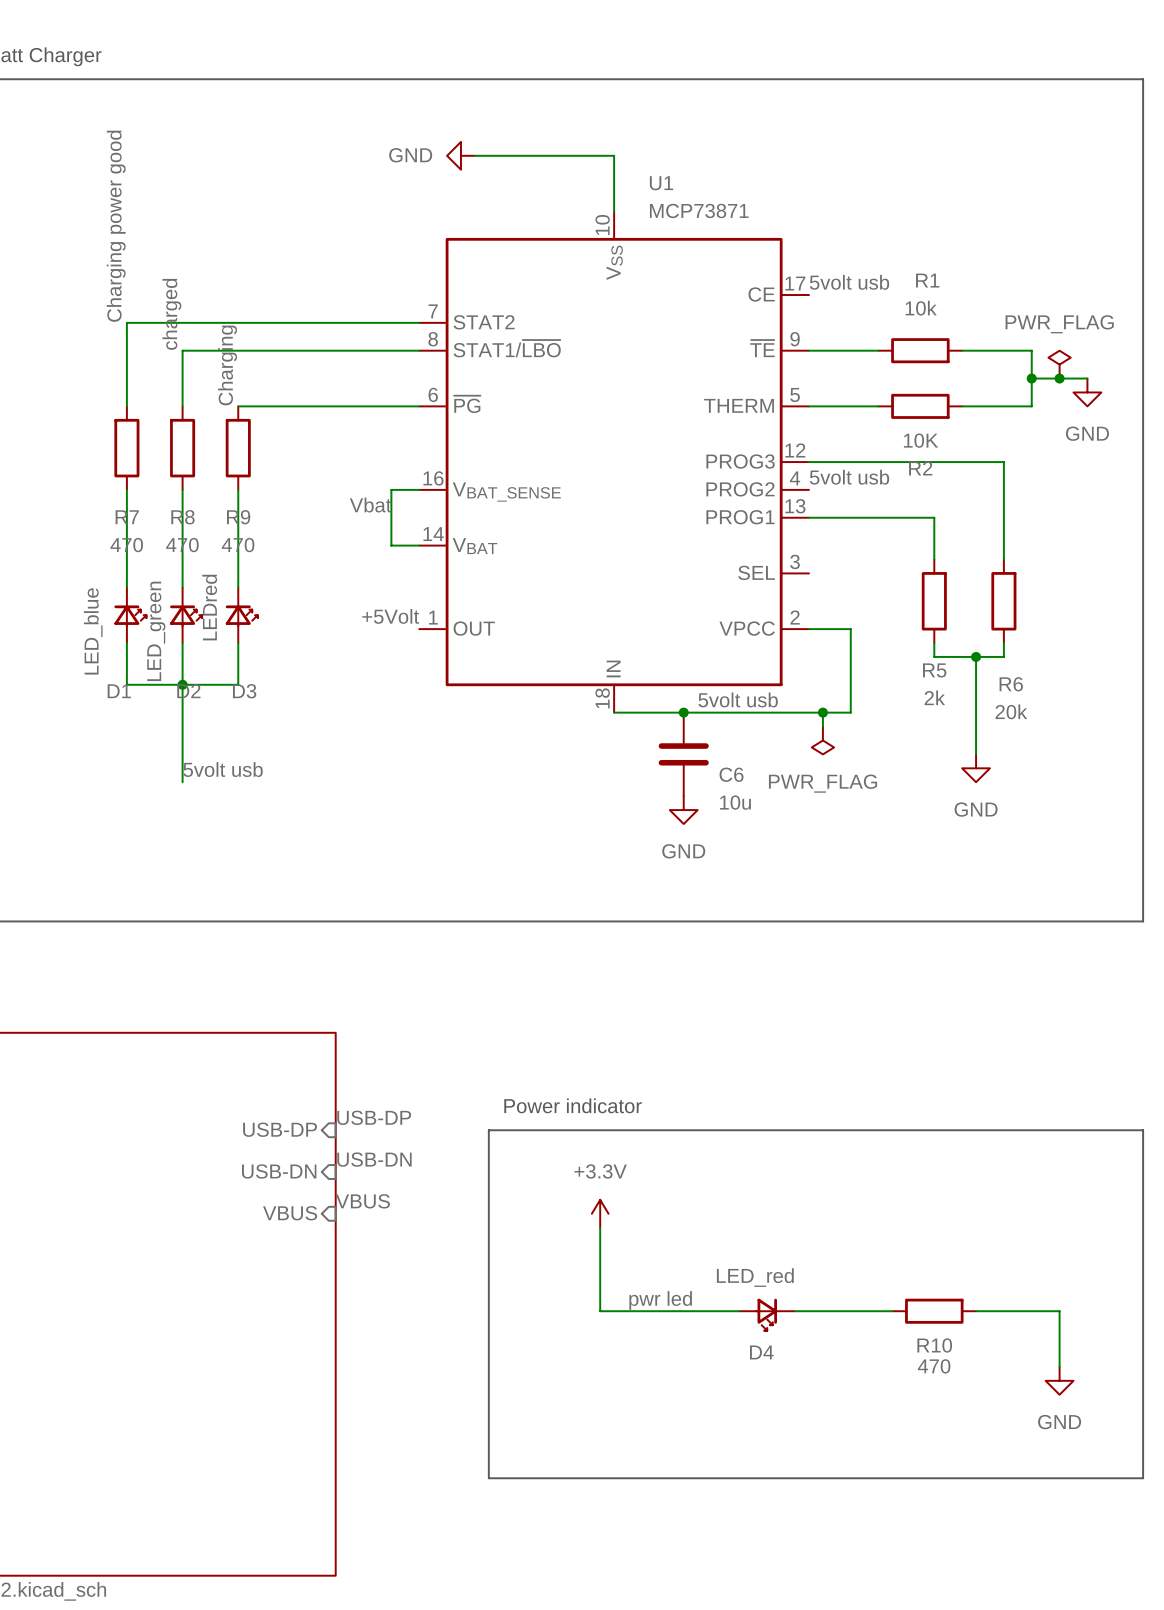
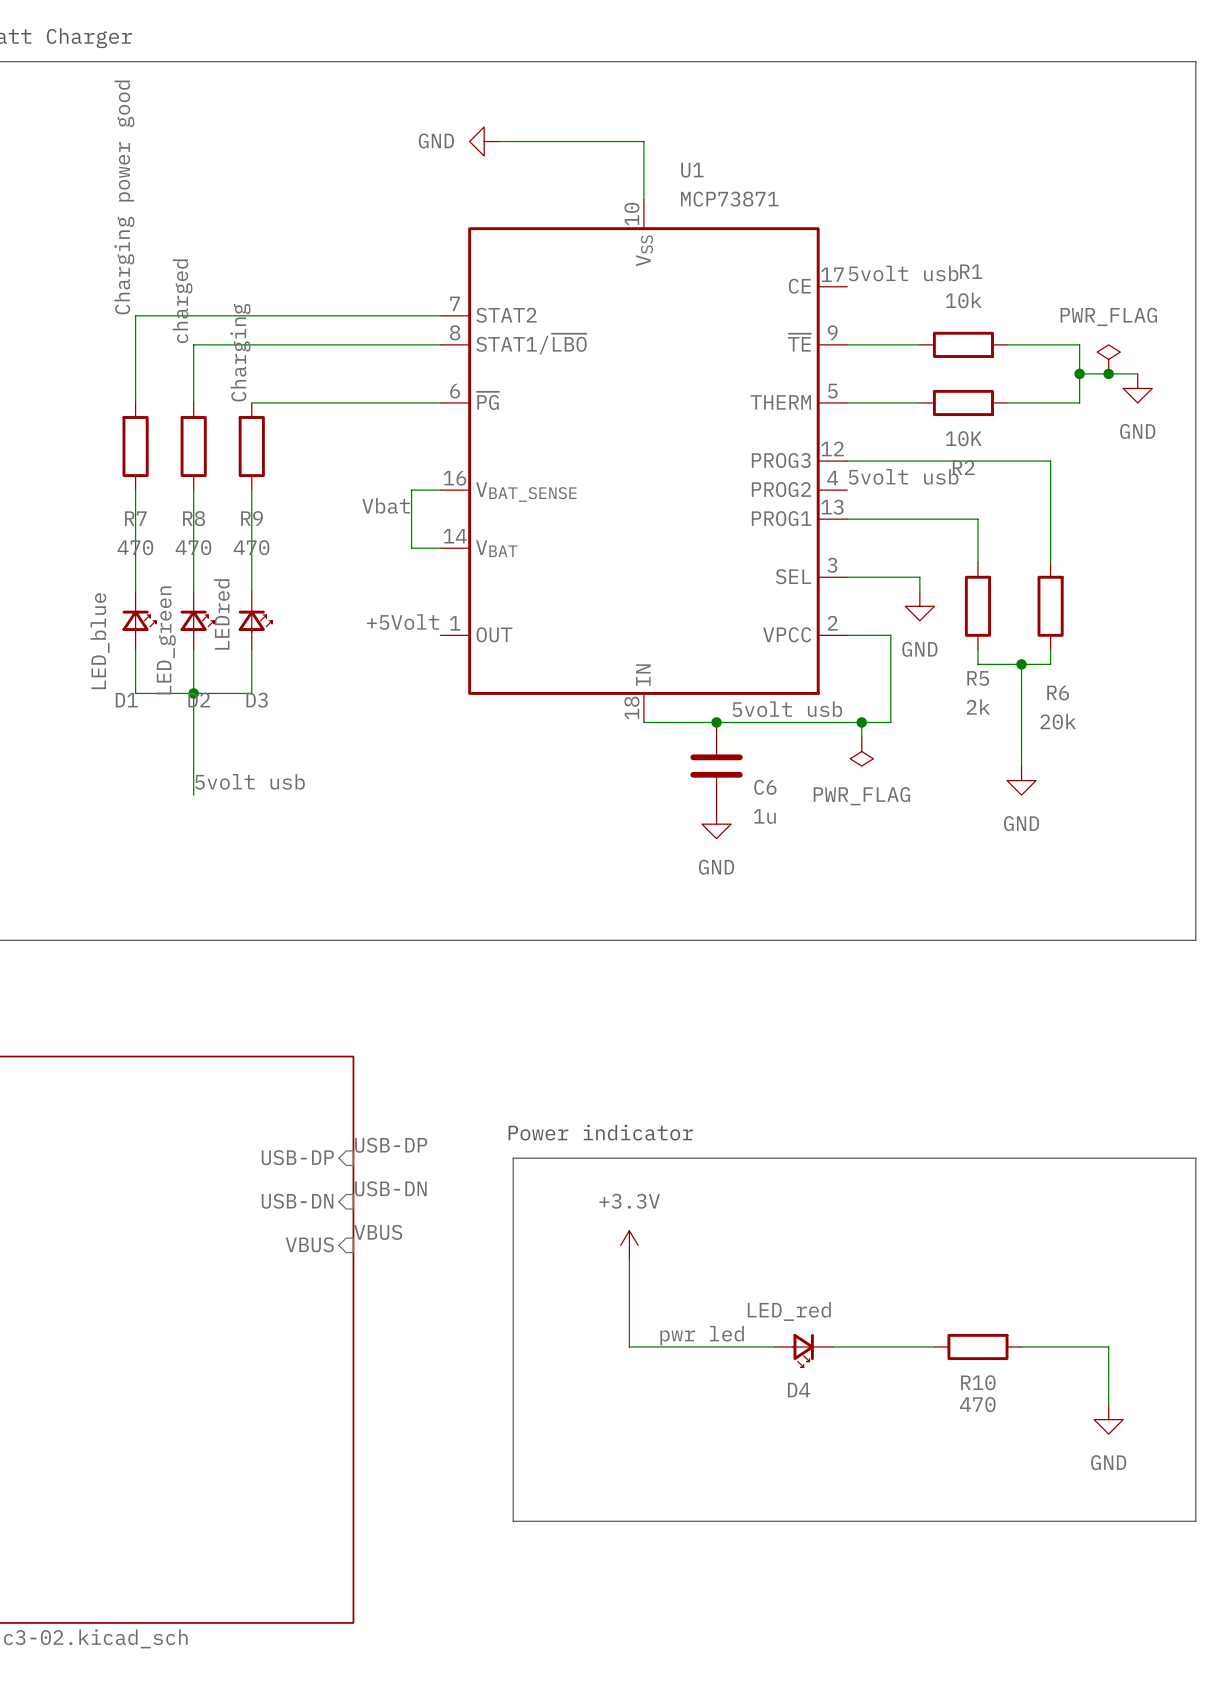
wire: none -> (847, 577) (919, 577) (919, 591)
power symbol: none -> GND (919, 606)
C6 value: 10u (735, 802) -> 1u (764, 816)

